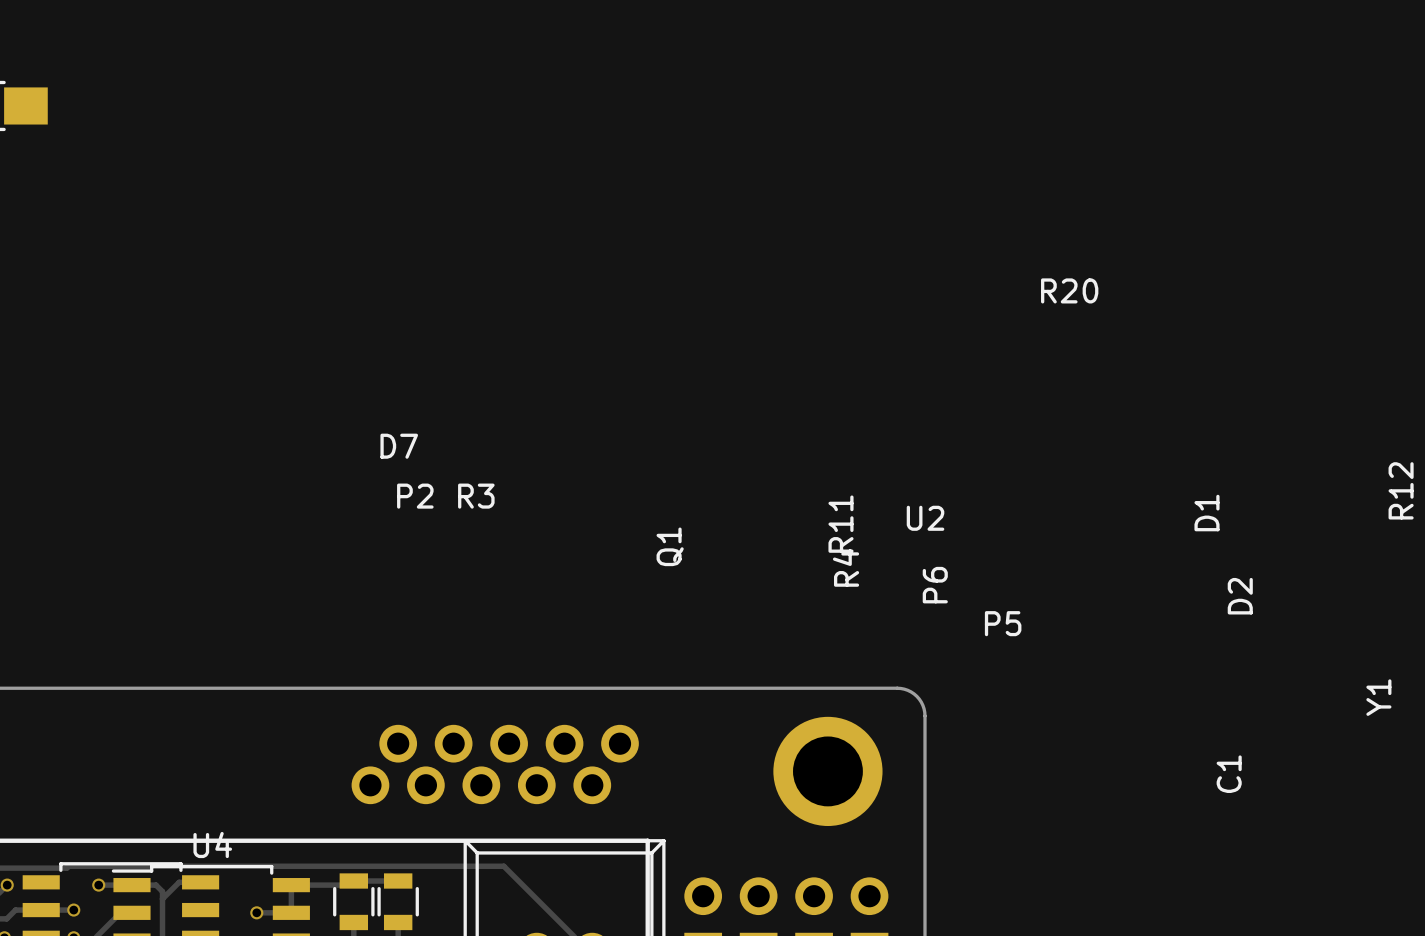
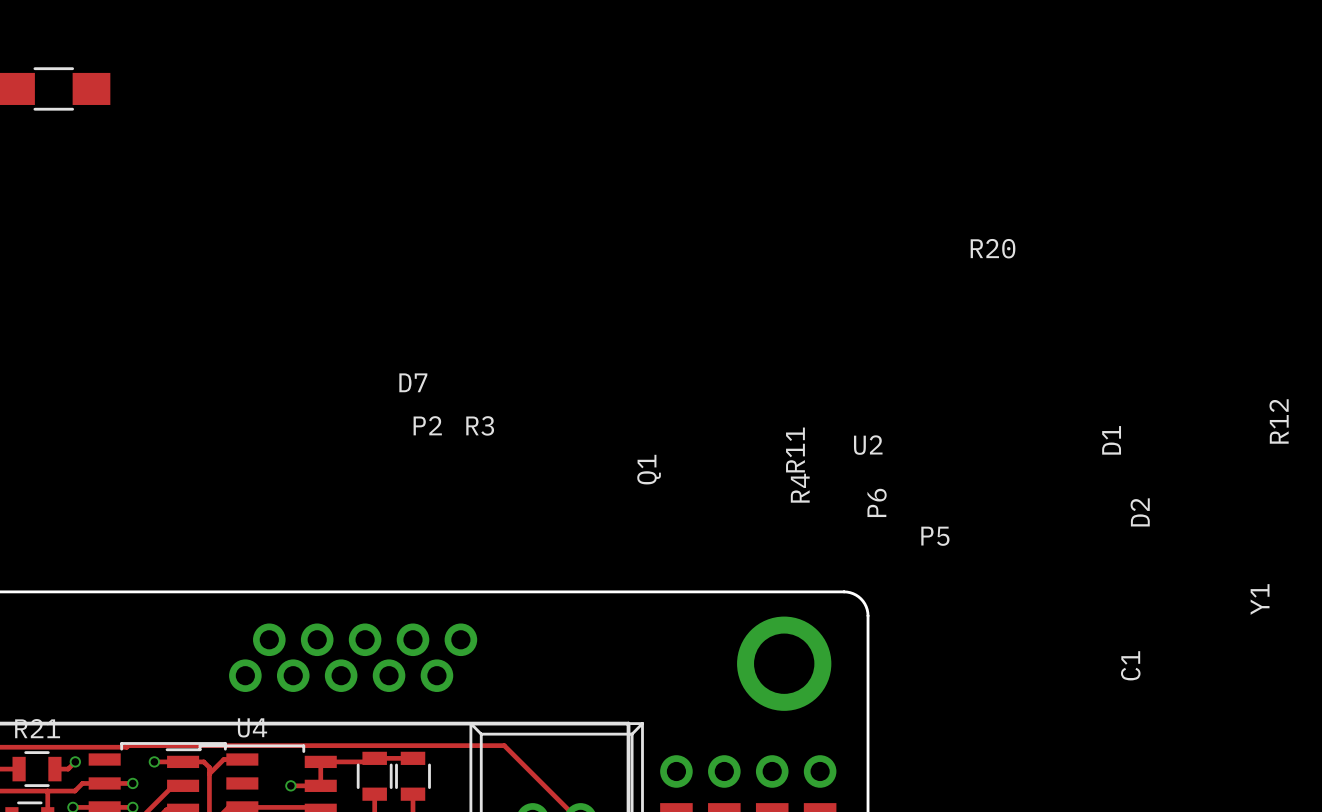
part: none -> (269, 639)
part: none -> (317, 639)
part: none -> (365, 639)
part: (509, 743) -> none
part: (564, 743) -> none
part: (620, 743) -> none
part: none -> (245, 675)
part: none -> (293, 675)
part: none -> (341, 675)
part: (481, 785) -> none
part: (536, 785) -> none
part: (592, 785) -> none

